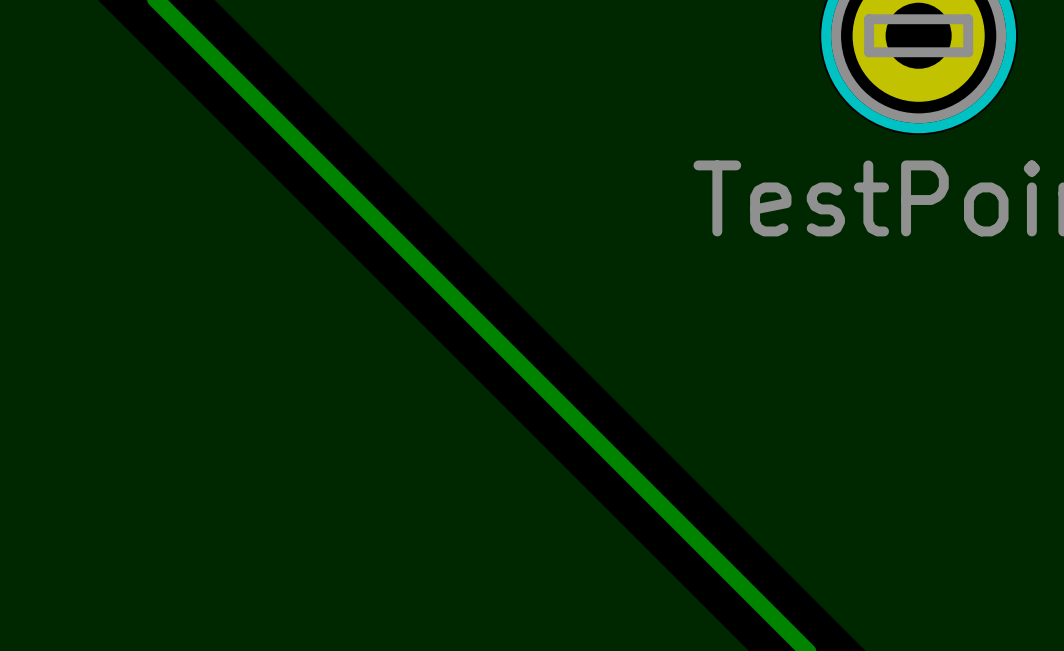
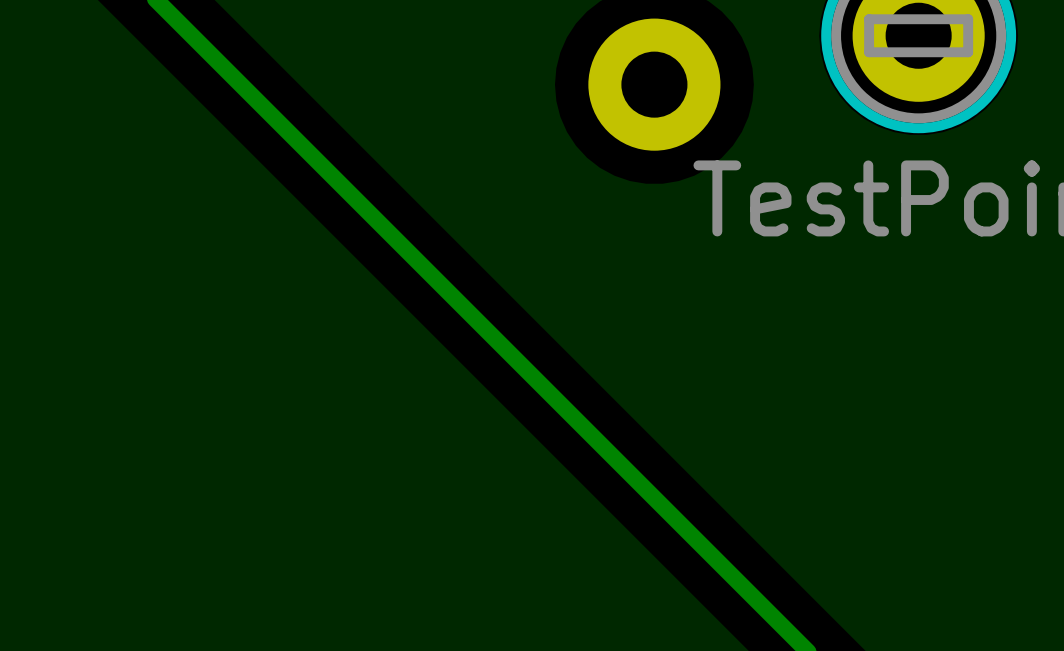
part: none -> (654, 84)

